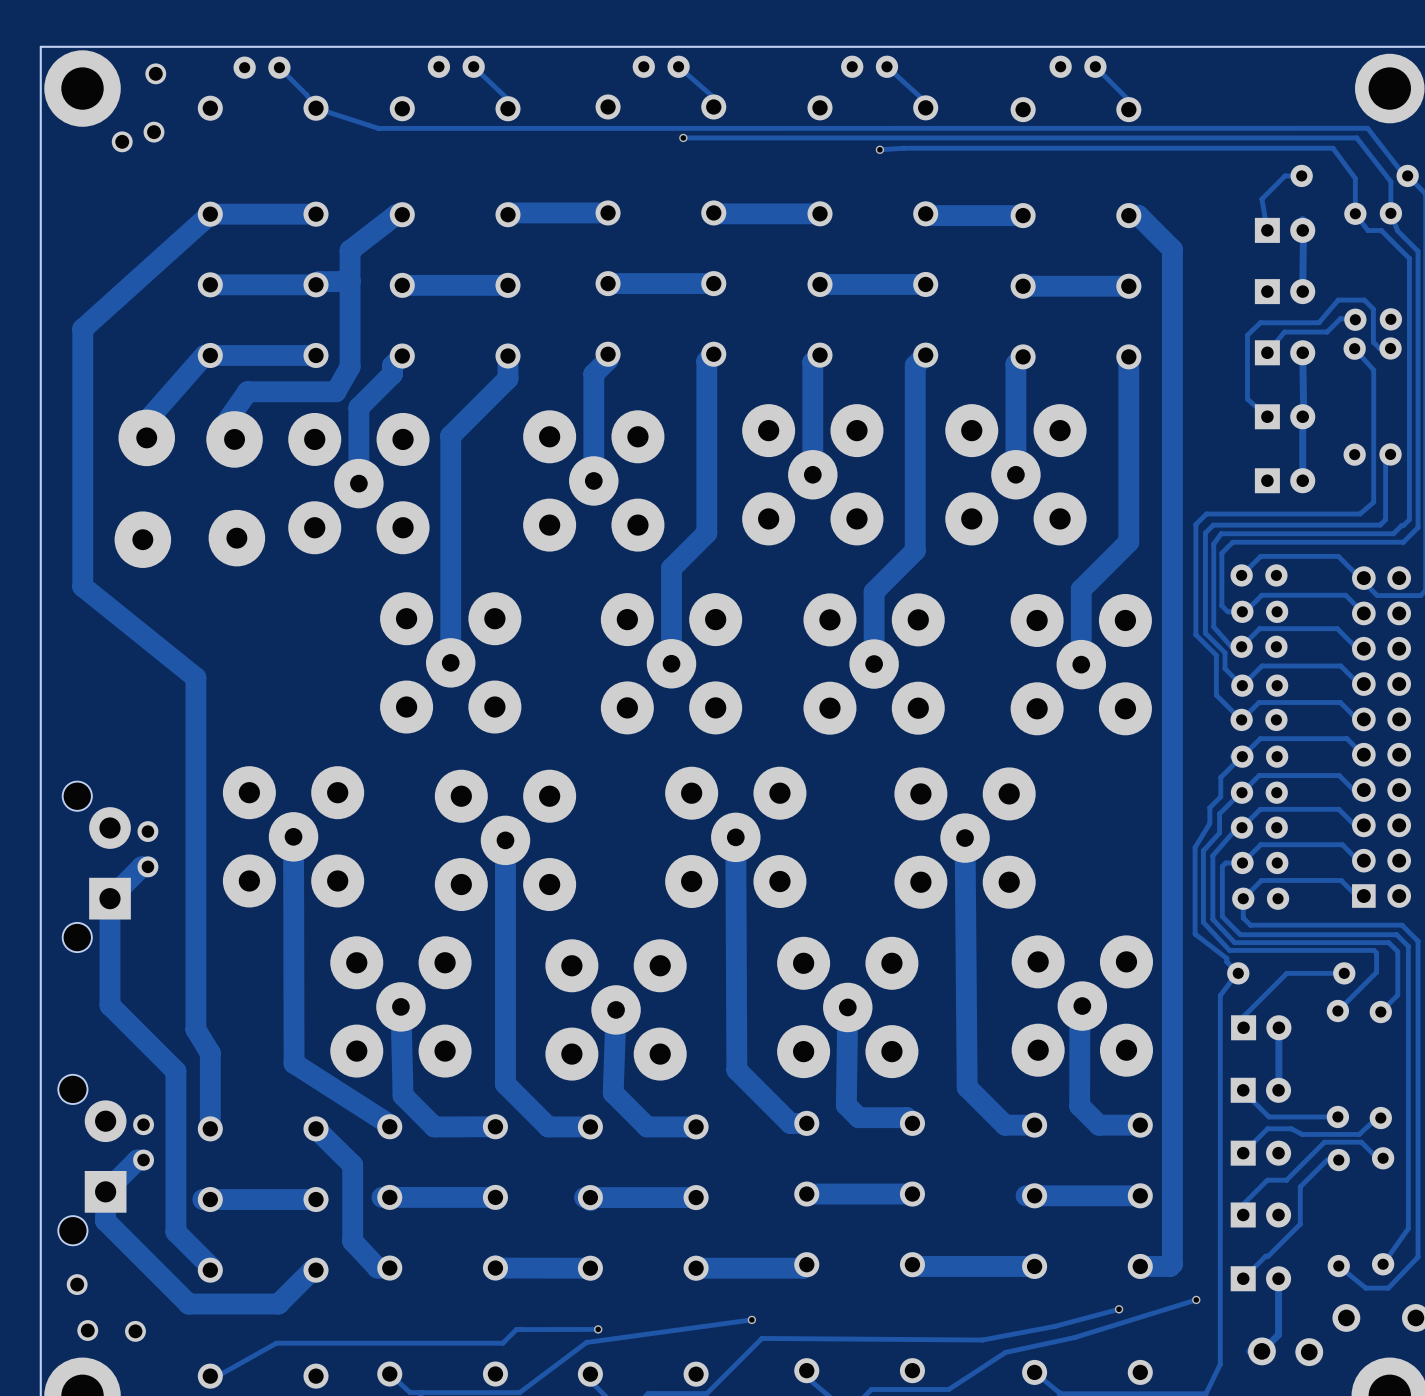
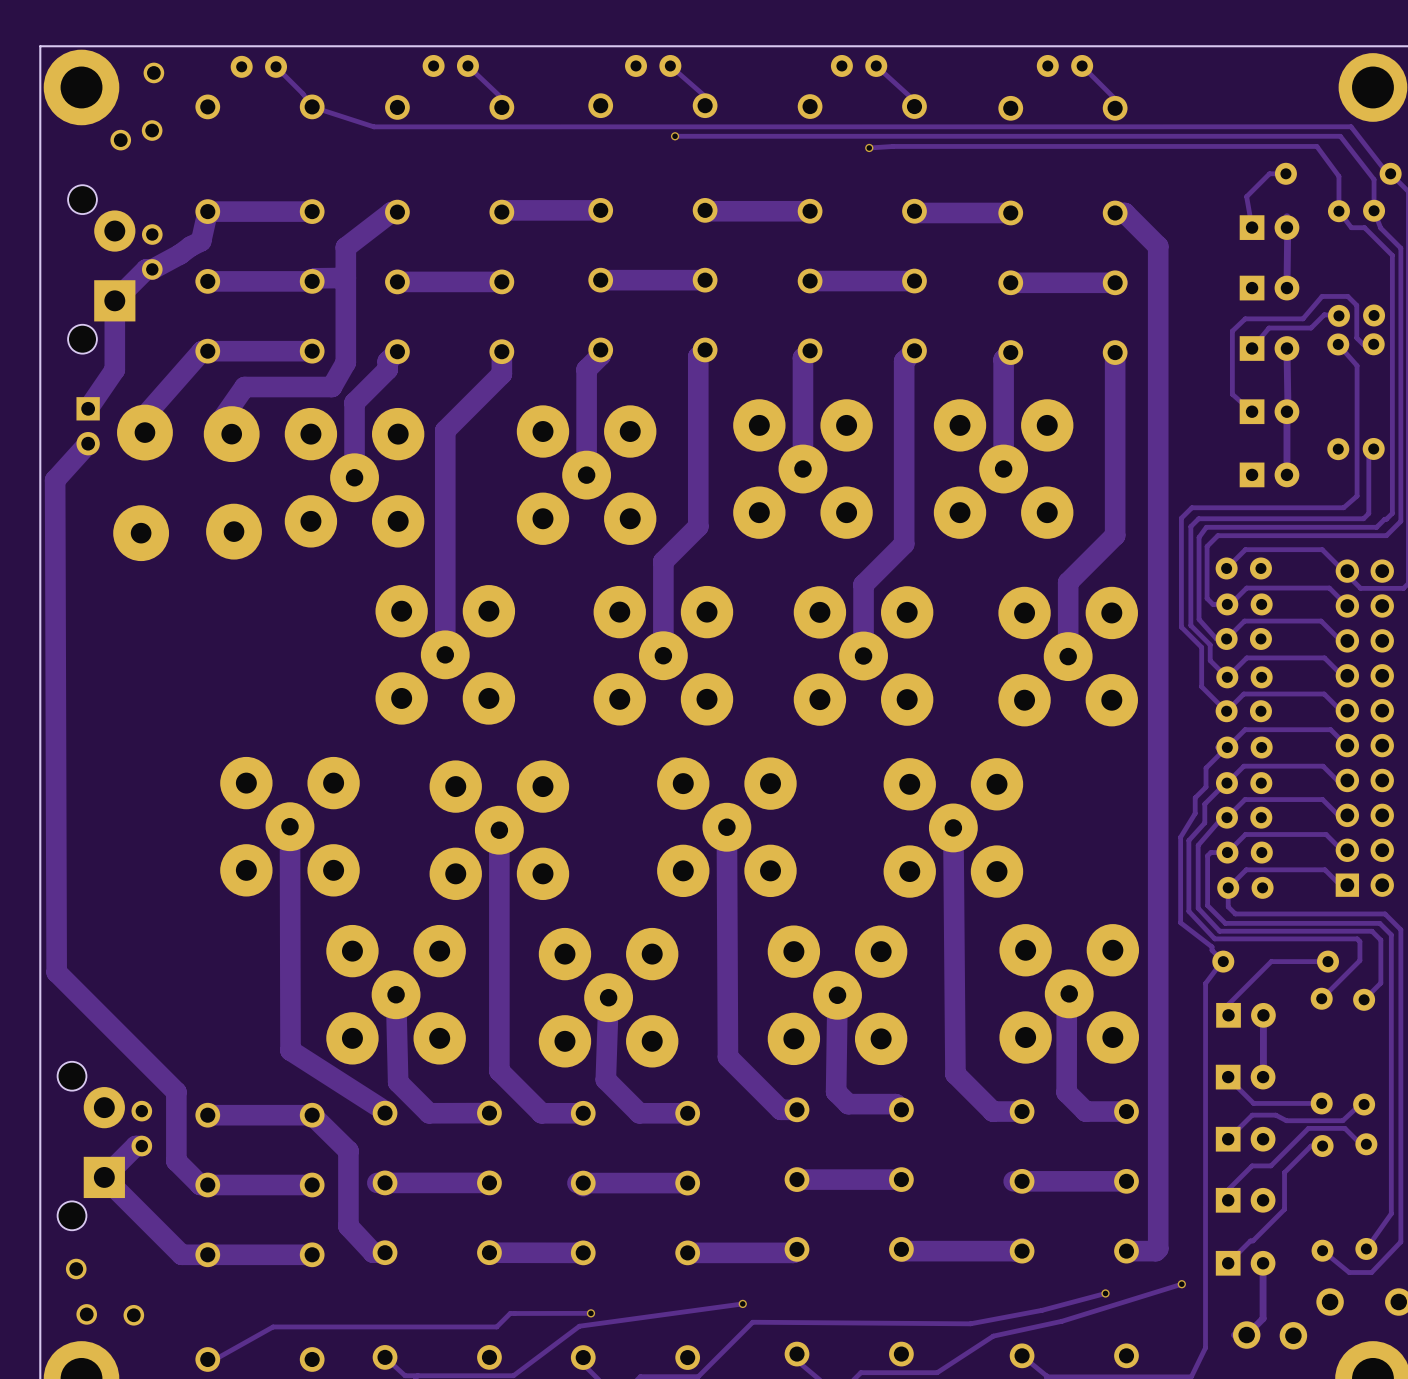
track: (210, 214) (82, 328) (82, 586) (195, 677) (195, 1029) (210, 1053) (210, 1128) -> (207, 211) (201, 241) (152, 269) (146, 269) (114, 300) (114, 369) (88, 408)
part: none -> (115, 269)
part: none -> (88, 426)
track: none -> (88, 443) (55, 480) (56, 972) (176, 1092) (176, 1161) (200, 1185)
part: (110, 866) -> none
track: (147, 866) (141, 866) (109, 898) (109, 1005) (175, 1071) (175, 1231) (210, 1266) (210, 1270) -> none
track: none -> (312, 1115) (207, 1115)
track: (105, 1191) (105, 1220) (188, 1304) (278, 1304) (312, 1270) -> (104, 1177) (181, 1254) (308, 1254)

